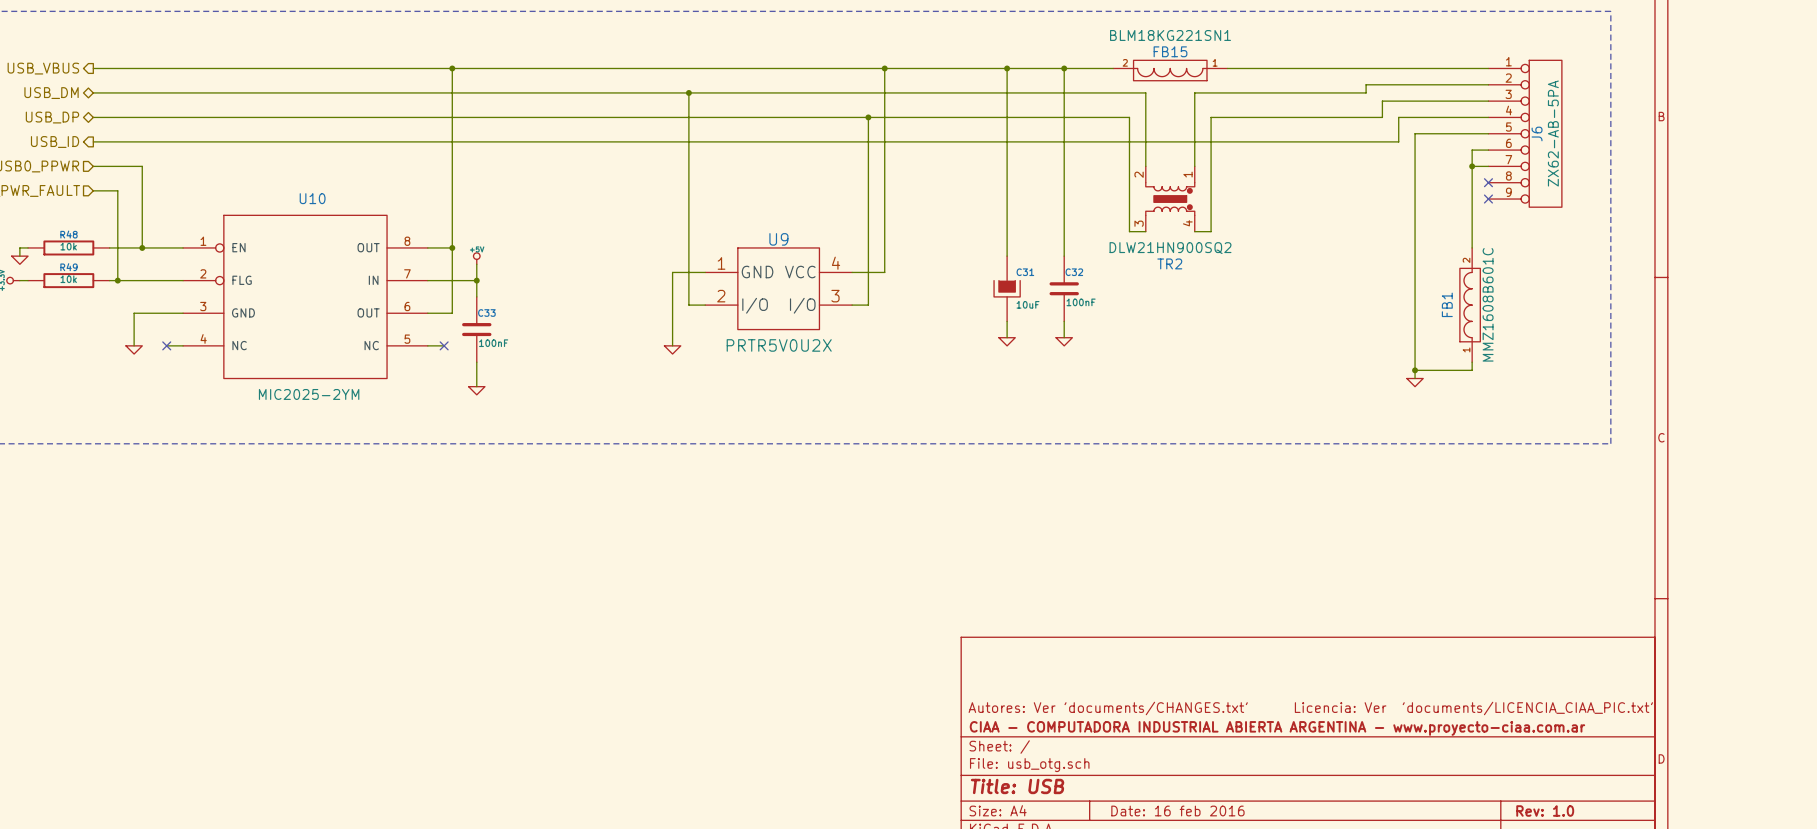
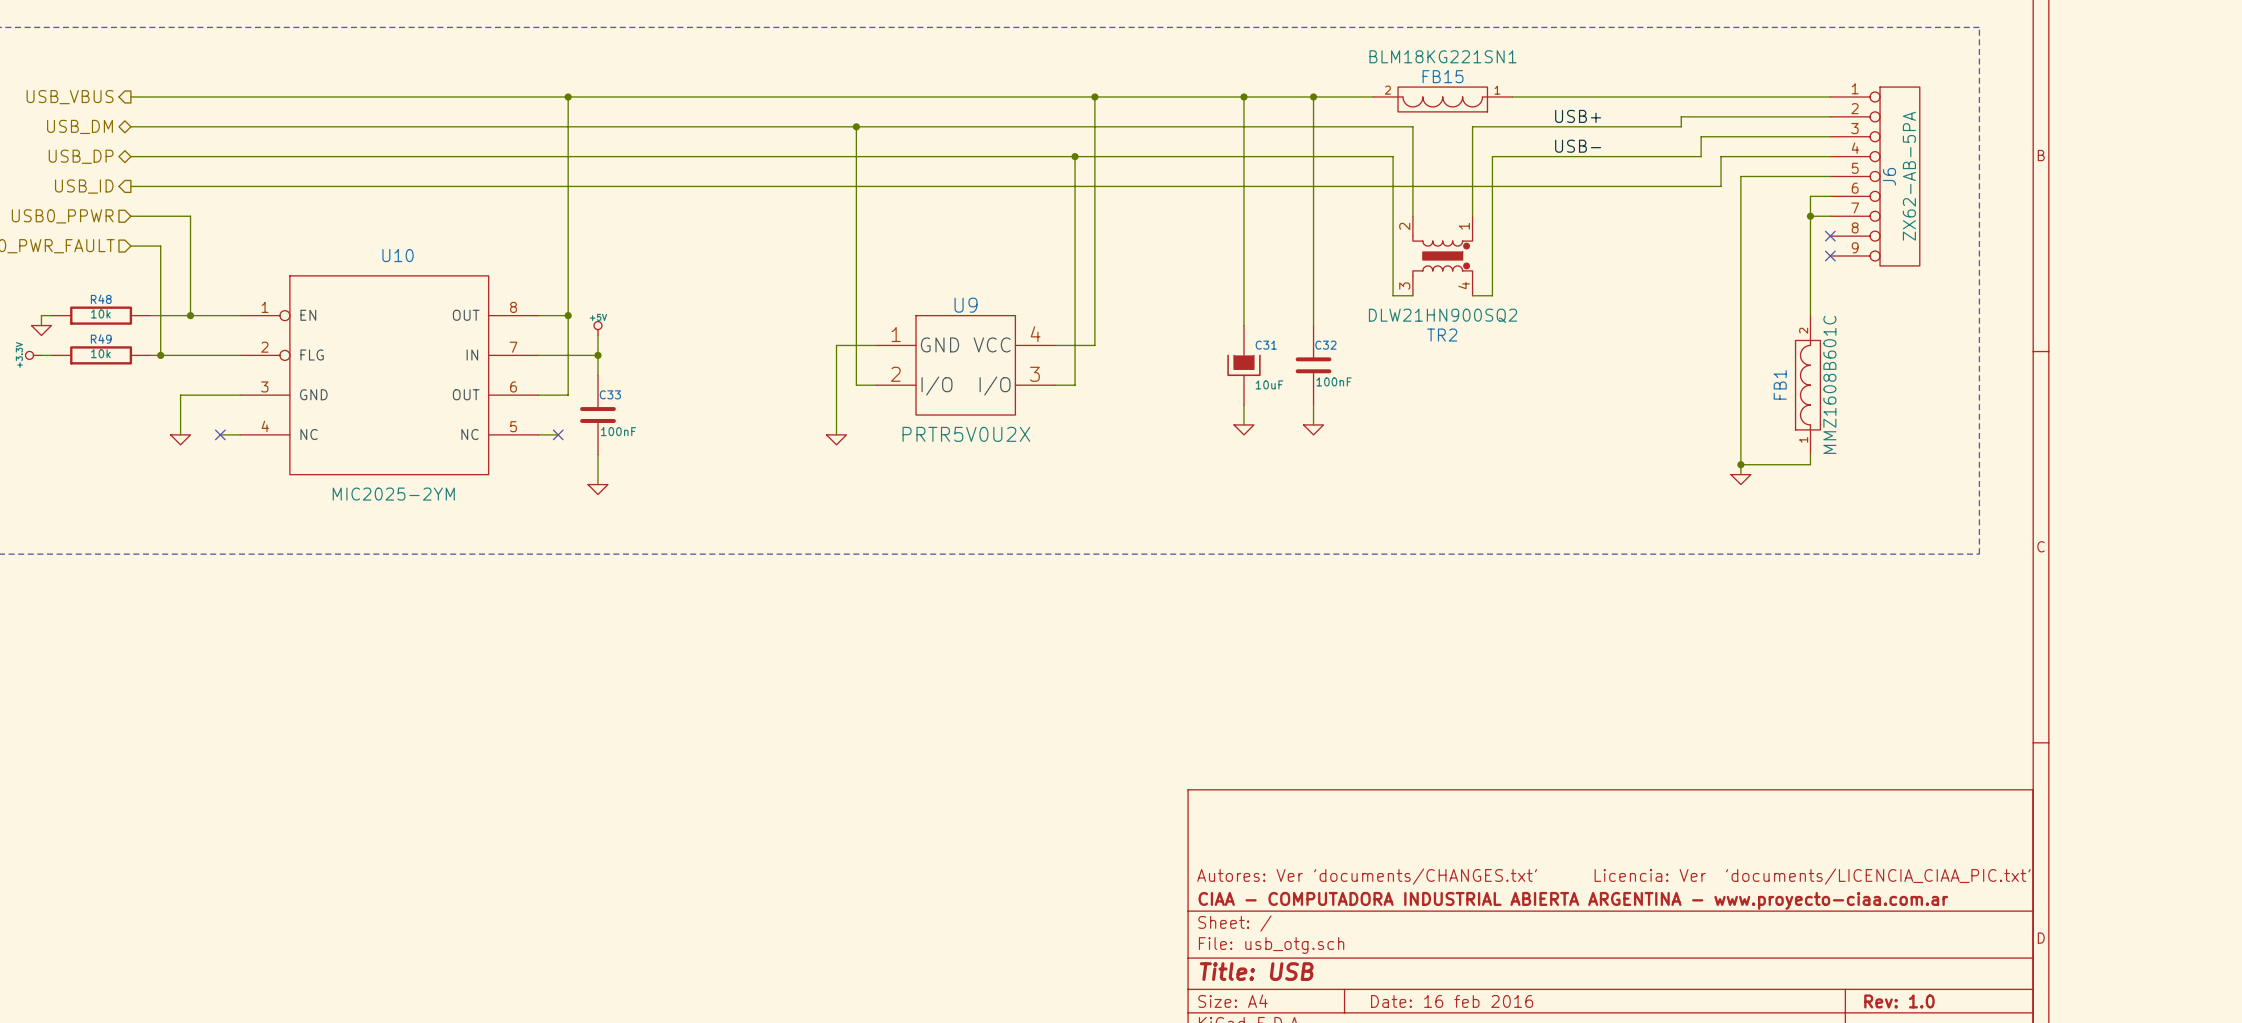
label: none -> USB+ (1578, 116)
label: none -> USB- (1578, 146)

